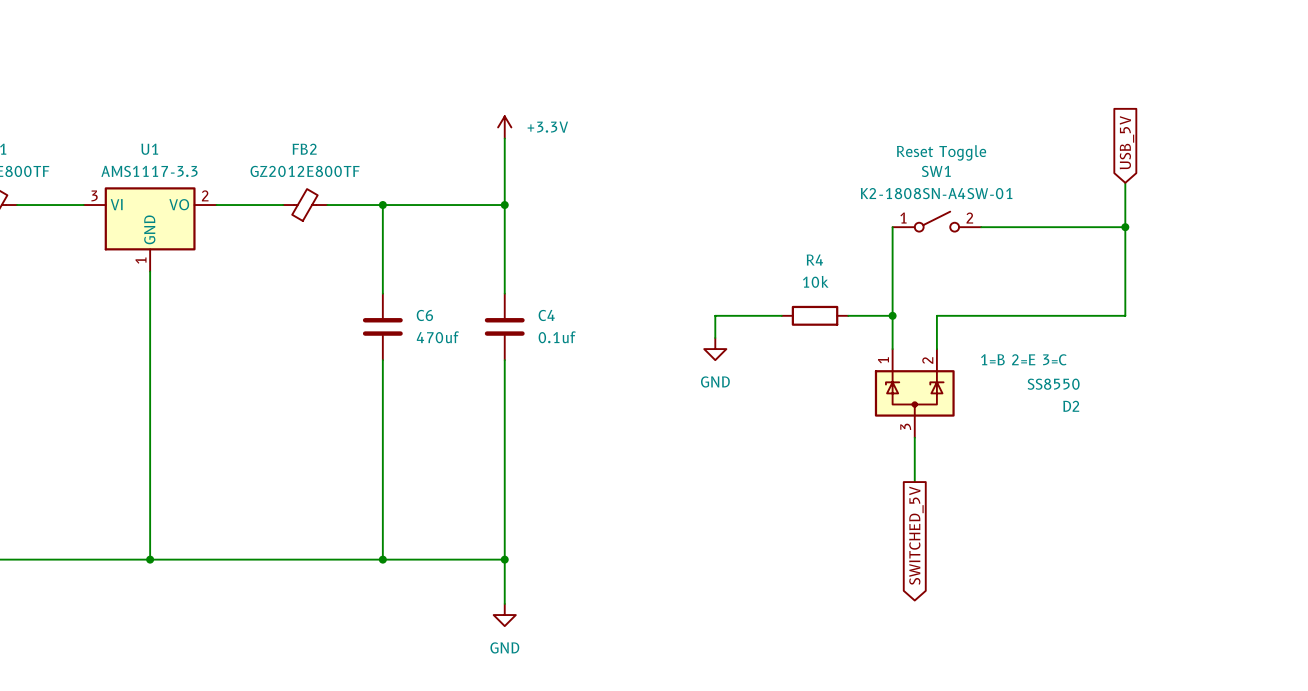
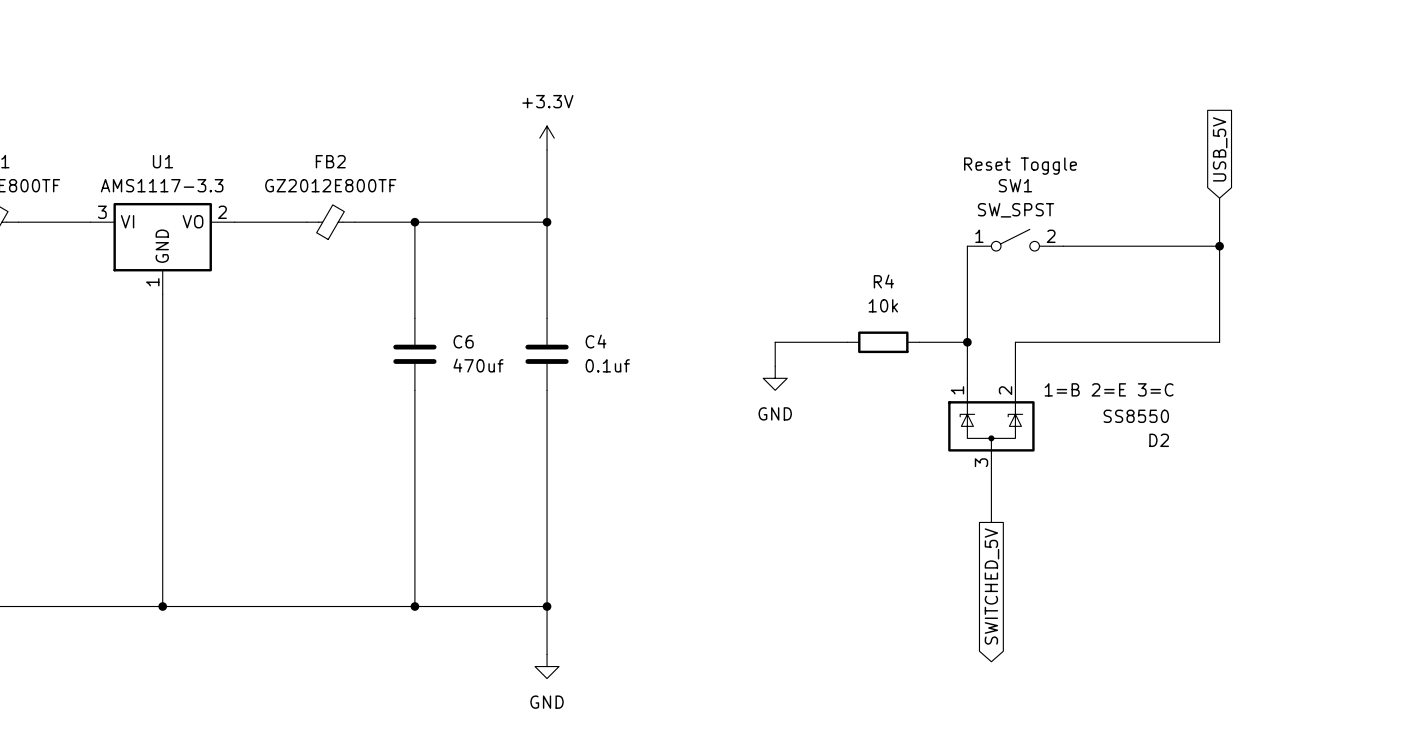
power symbol text position: +3.3V (547, 127) -> +3.3V (547, 101)
SW1 value: K2-1808SN-A4SW-01 (936, 193) -> SW_SPST (1015, 210)

